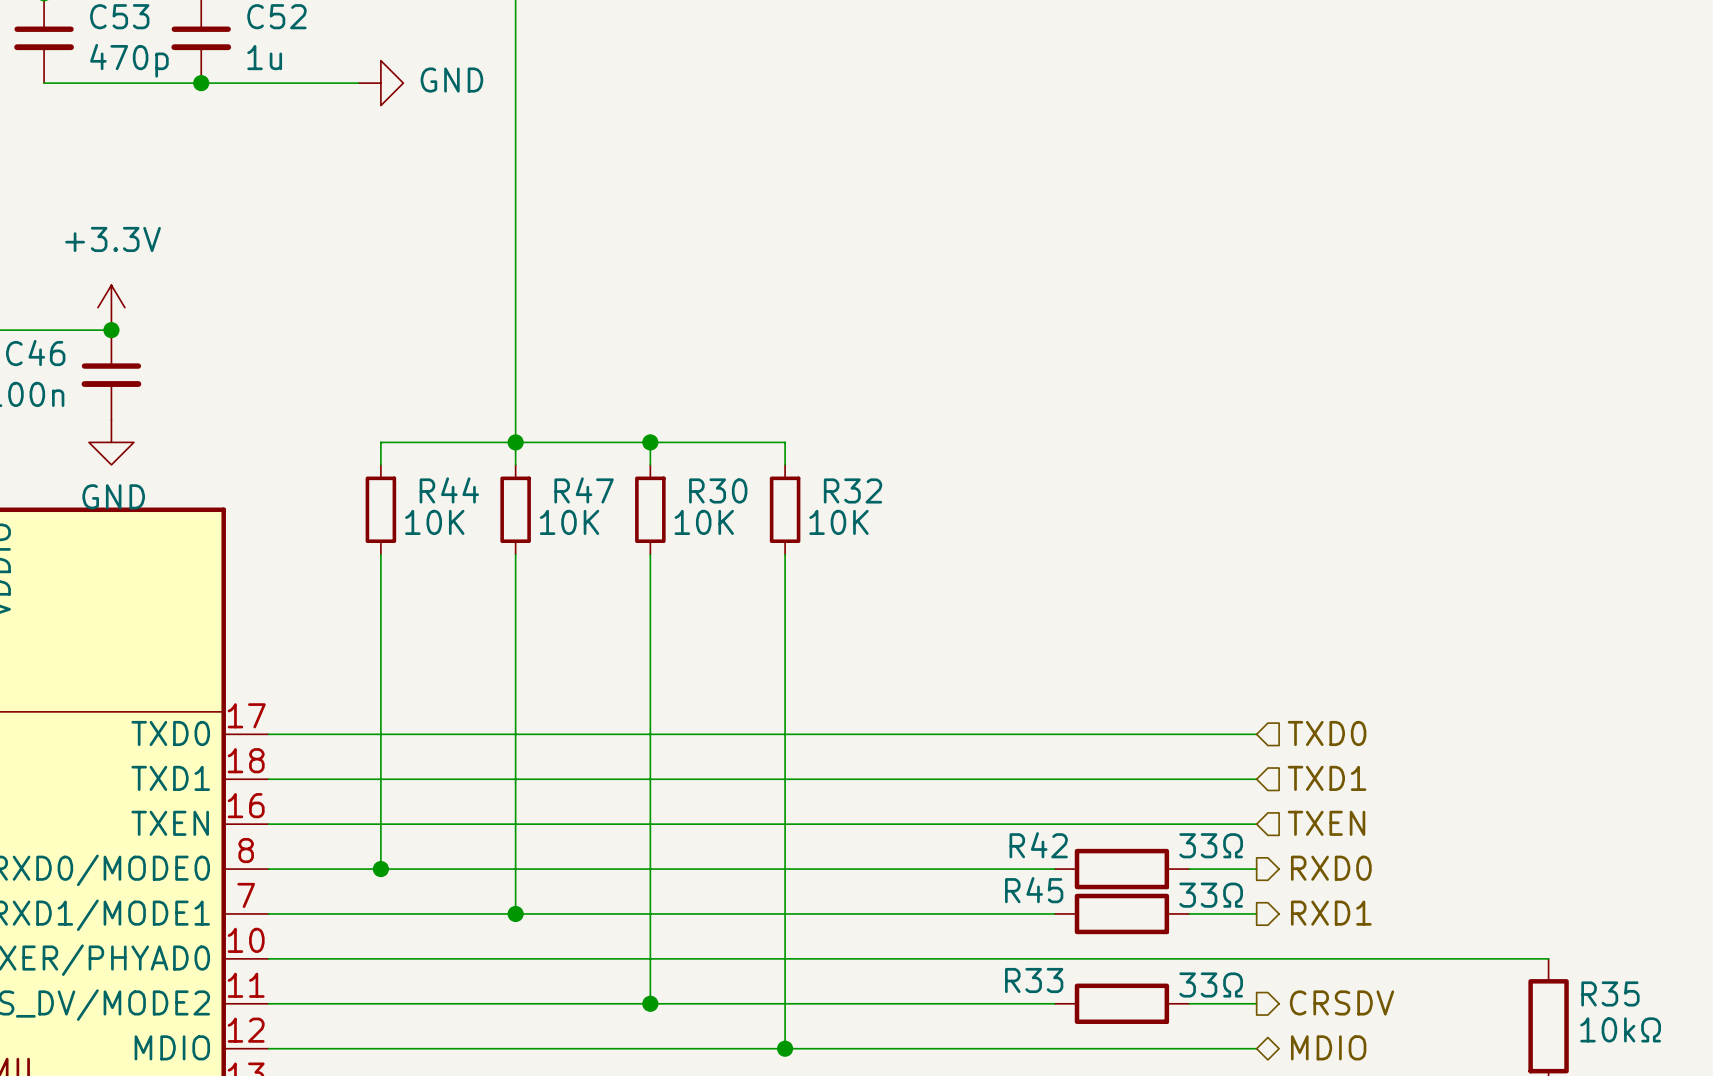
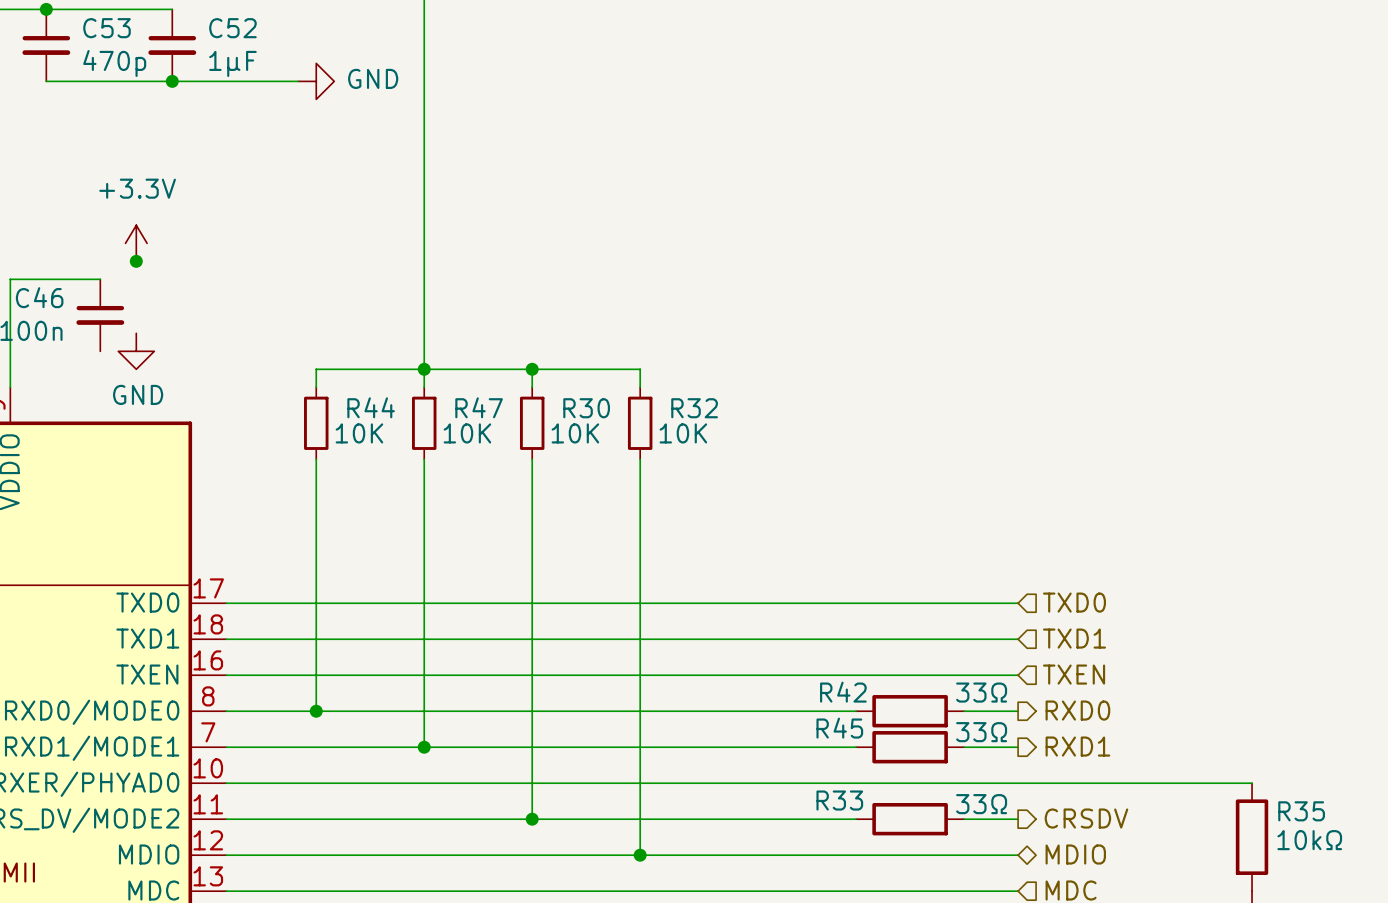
C52 value: 1u (264, 57) -> 1μF (232, 63)
power symbol position: +3.3V (111, 307) -> +3.3V (136, 243)
junction position: (111, 330) -> (136, 261)
power symbol position: GND (111, 442) -> GND (136, 351)

